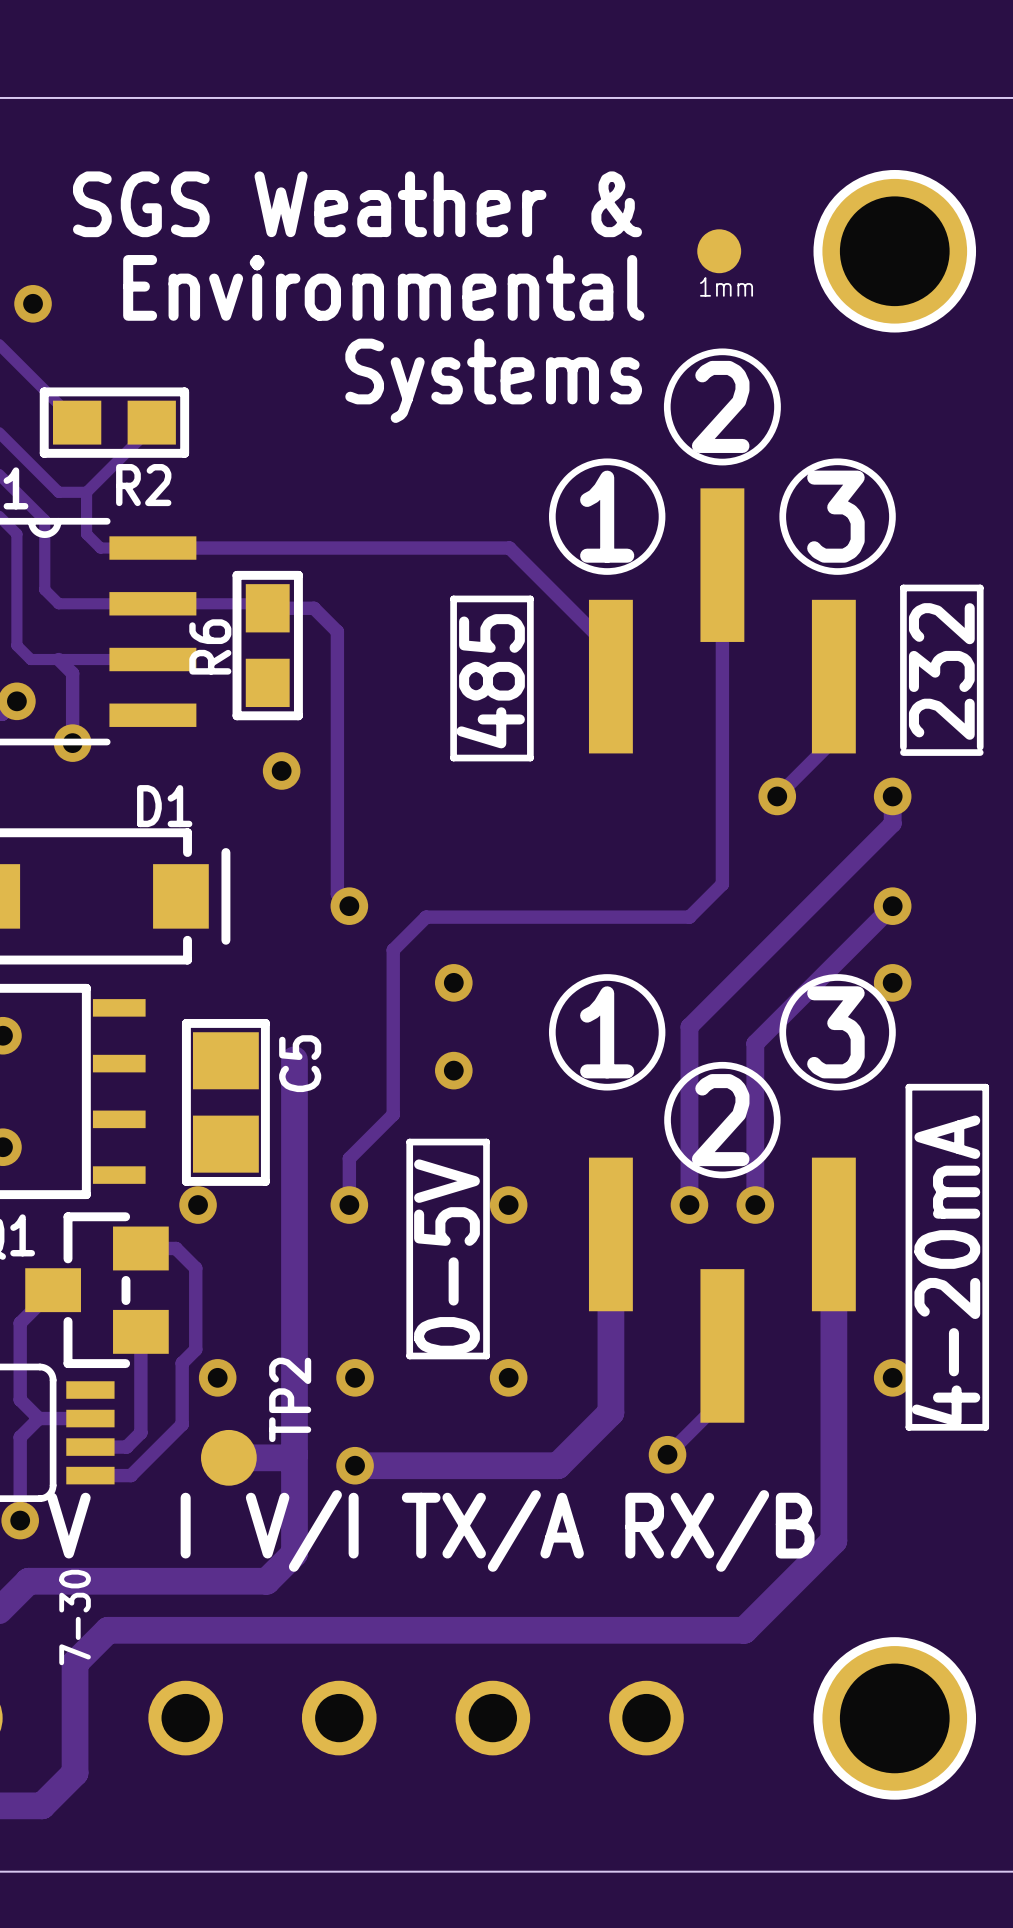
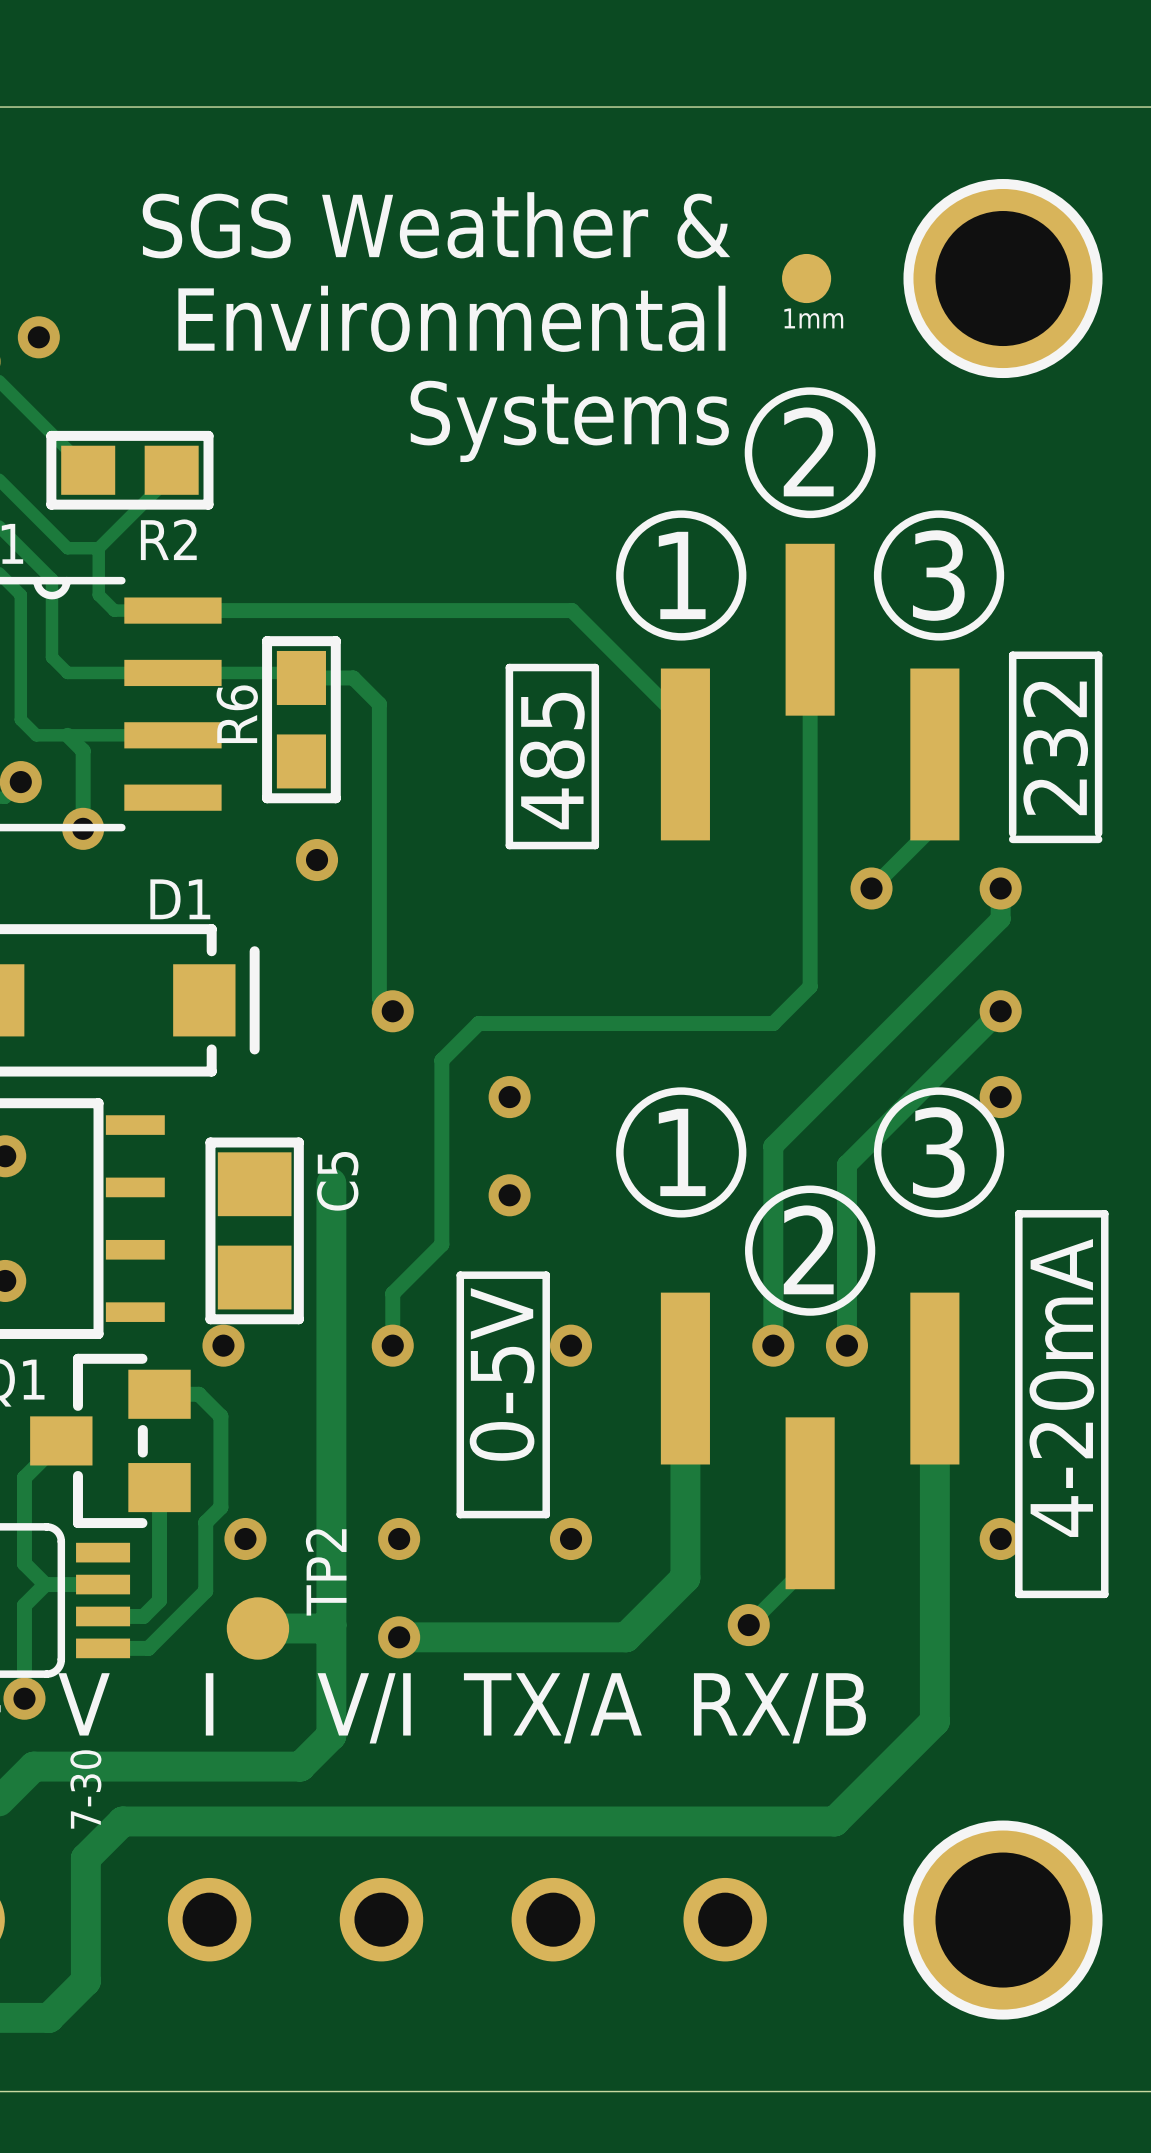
part footprint: [813, 169, 977, 333] -> [903, 179, 1103, 379]
part footprint: [813, 1637, 977, 1800] -> [903, 1820, 1103, 2020]

